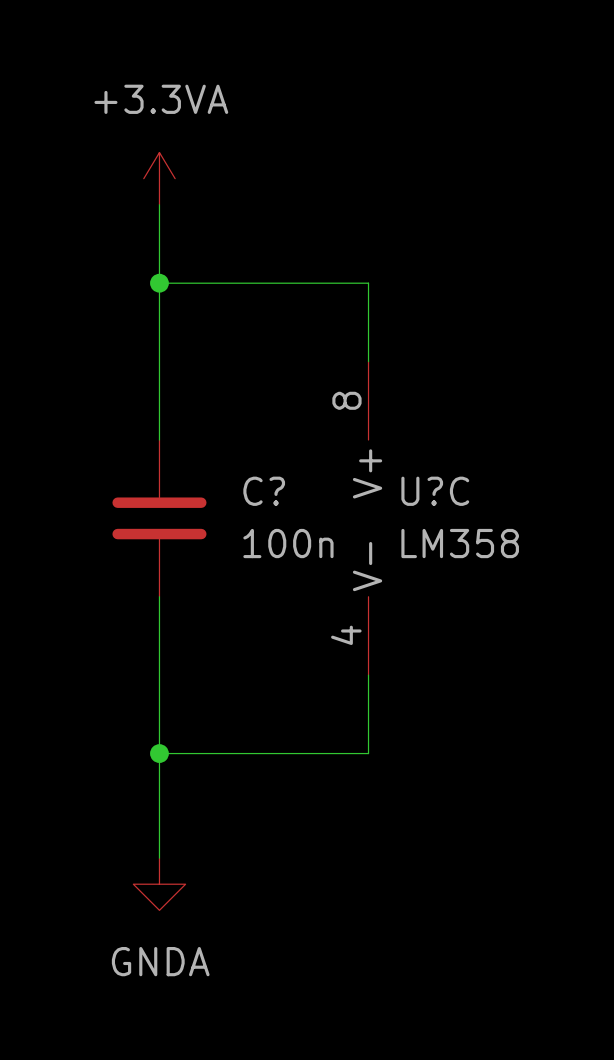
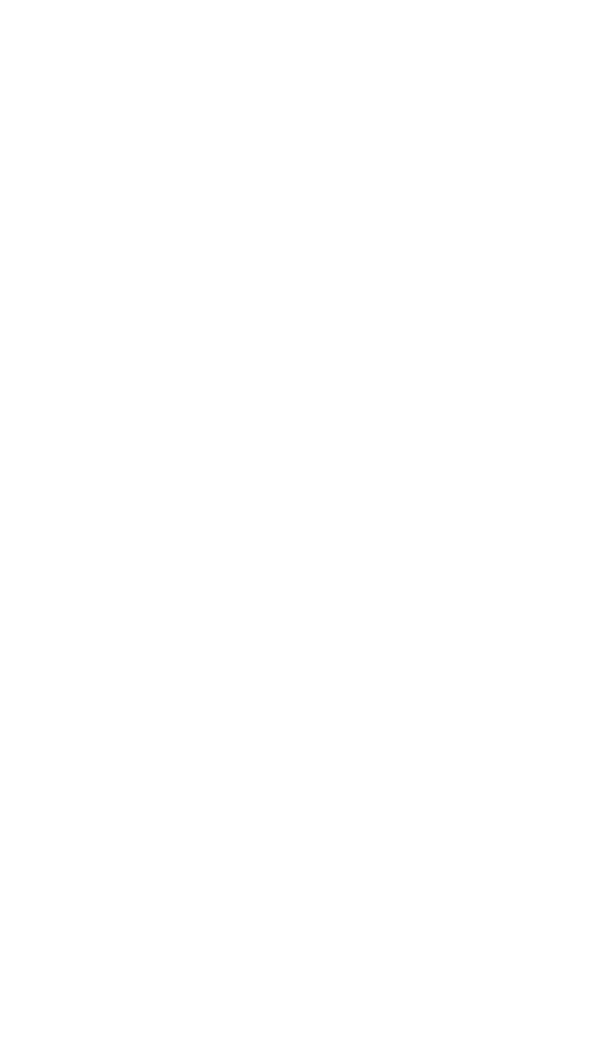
power symbol: +3.3VA (159, 178) -> none
wire: (159, 204) (159, 439) -> none
wire: (159, 283) (368, 283) (368, 361) -> none
junction: (159, 283) -> none
C?: 100n (159, 518) -> none
U?C: LM358 (368, 518) -> none
wire: (159, 596) (159, 858) -> none
wire: (368, 675) (368, 753) (159, 753) -> none
junction: (159, 753) -> none
power symbol: GNDA (159, 884) -> none

